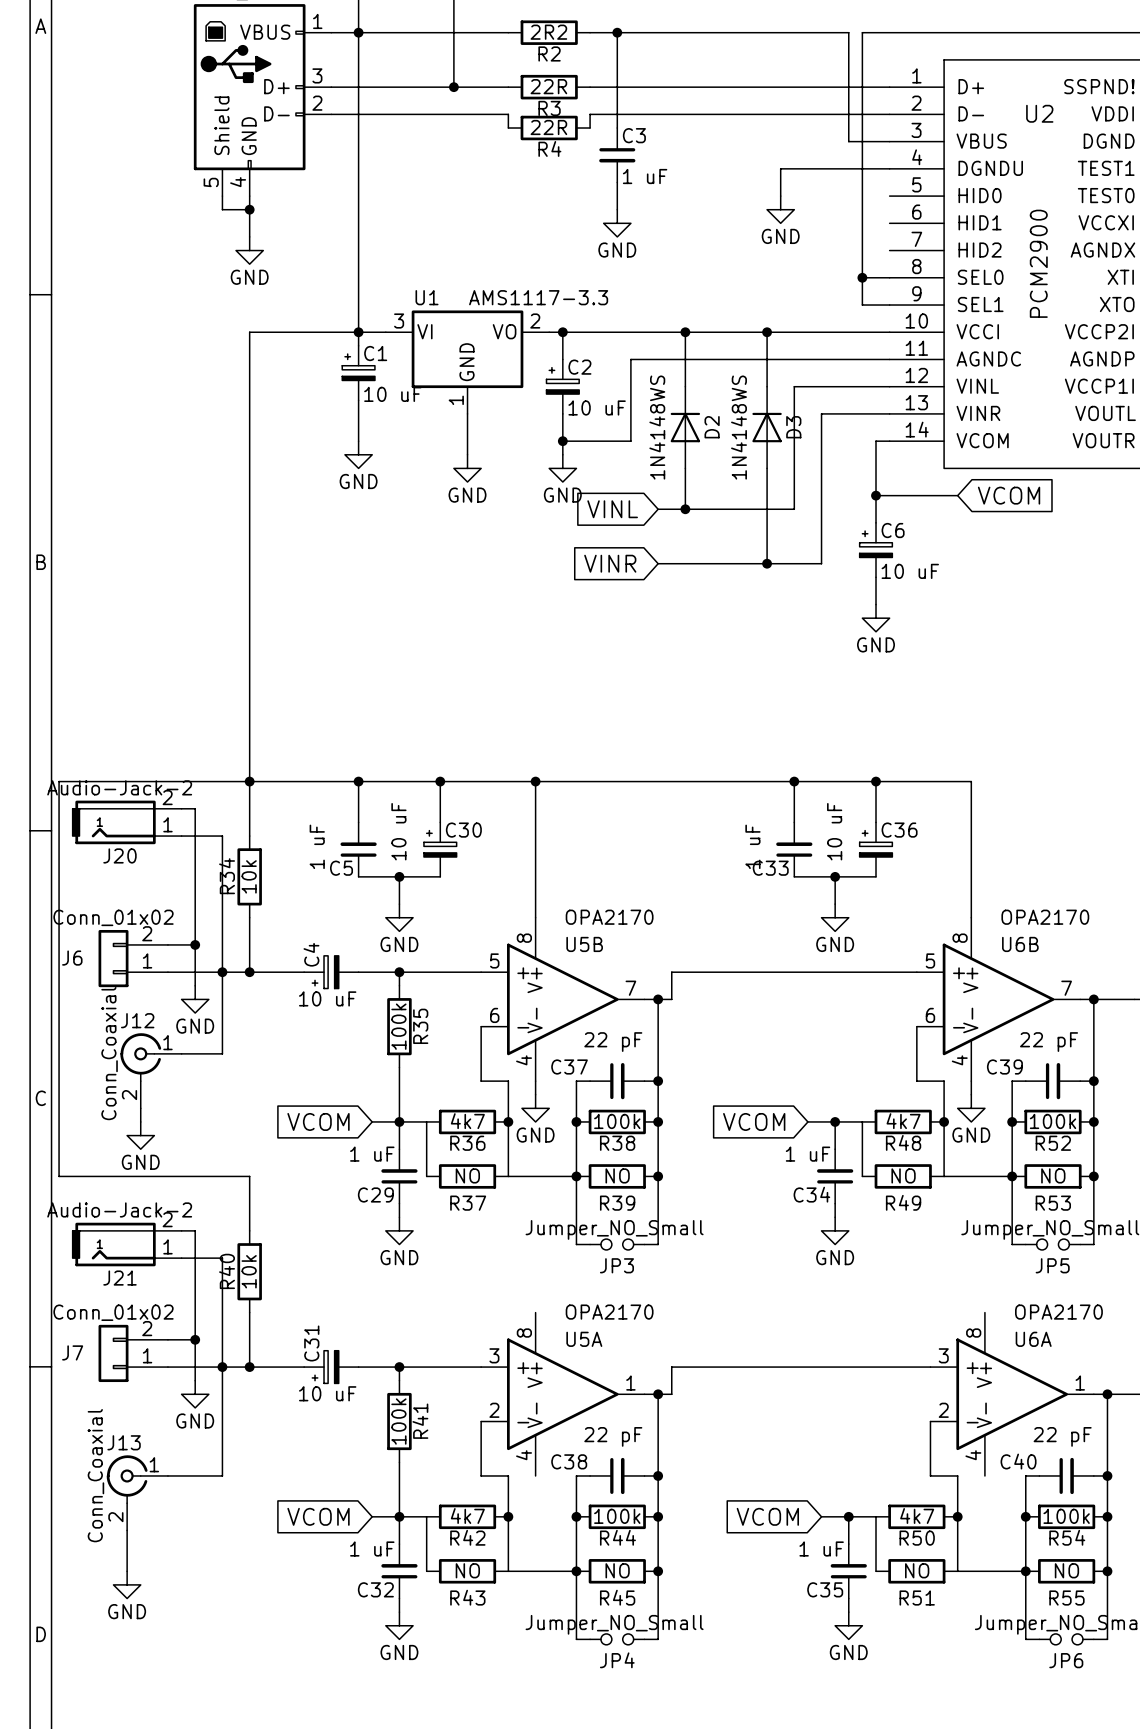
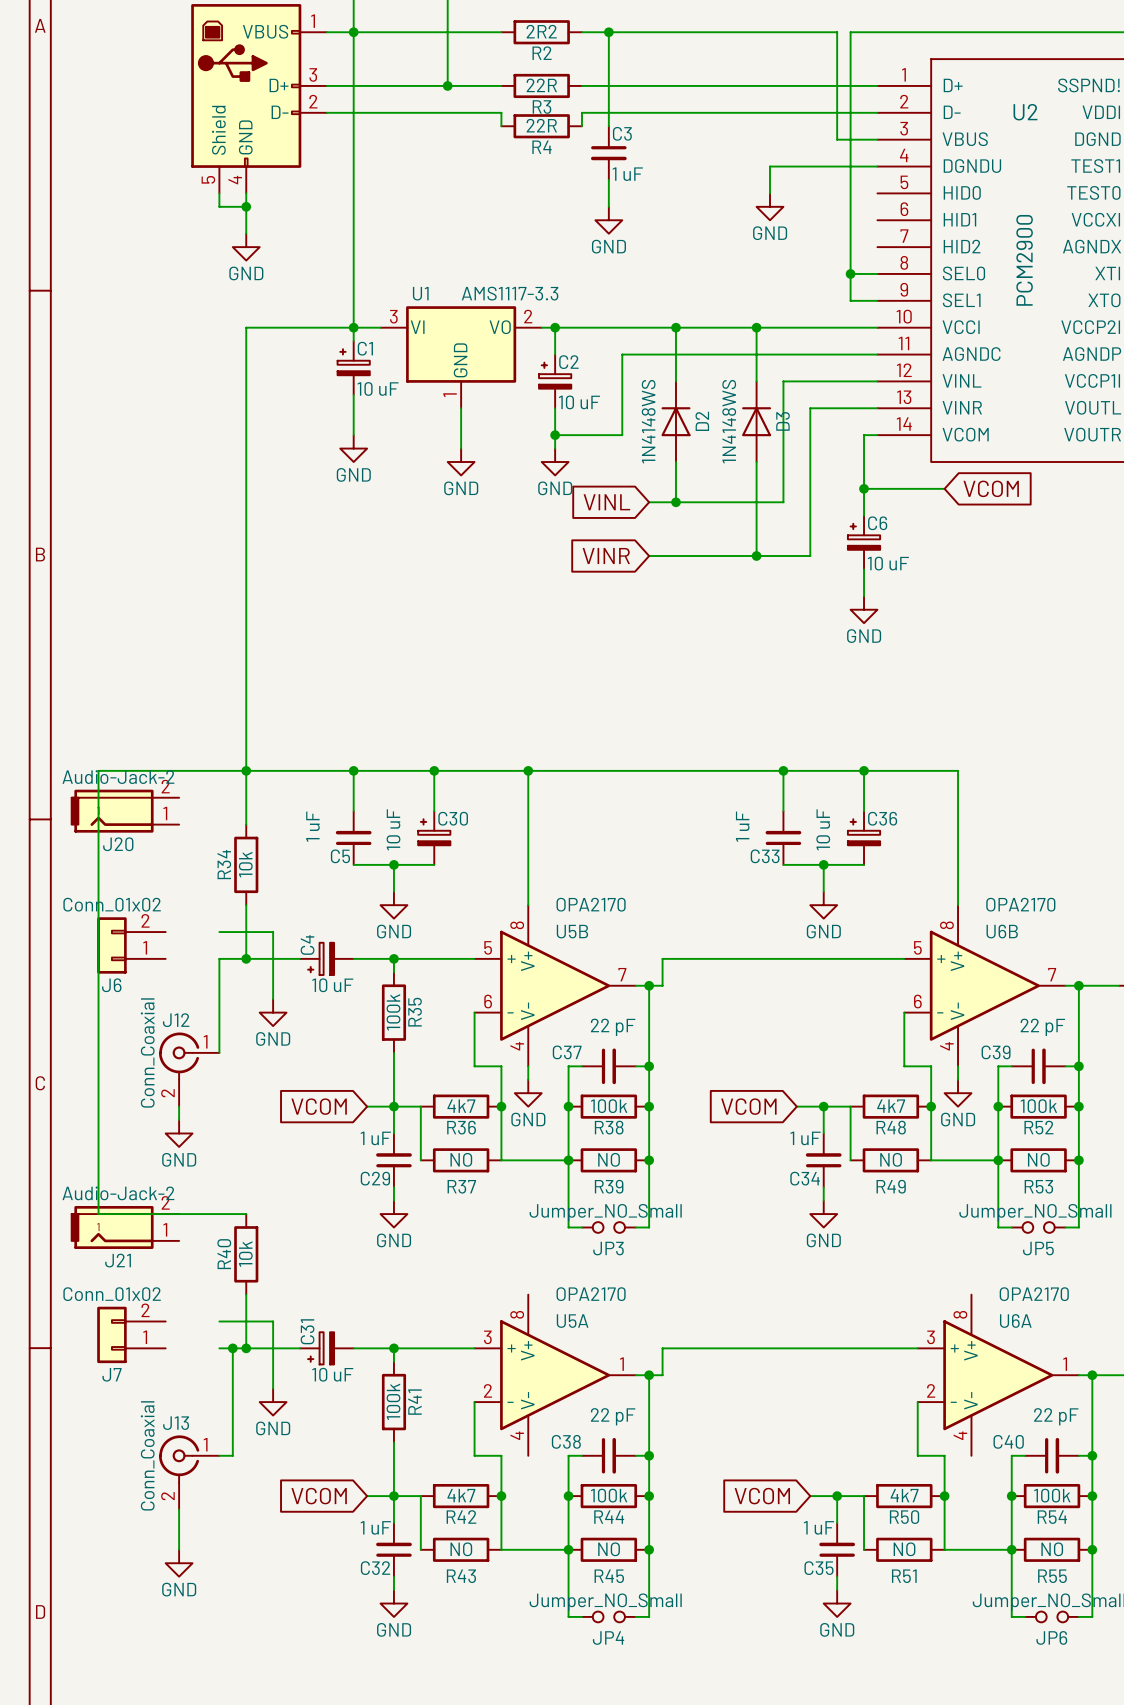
wire: (99, 781) (59, 781) (59, 1176) (249, 1176) (249, 1230) -> (98, 770) (98, 1214) (179, 1214)
wire: (181, 808) (195, 808) (195, 985) -> none
wire: (181, 836) (222, 836) (222, 972) (167, 972) -> none
wire: (167, 944) (195, 944) -> none
junction: (195, 944) -> none
wire: none -> (219, 932) (273, 932) (273, 999)
J6 name position: J6 (72, 958) -> J6 (111, 985)
junction: (222, 972) -> none
power symbol: GND (195, 999) -> none
power symbol: none -> GND (273, 1012)
wire: (181, 1053) (222, 1053) -> (219, 1052) (219, 1039)
J12 position: (150, 1070) -> (189, 1069)
wire: (140, 1108) (140, 1121) -> (179, 1106) (179, 1120)
power symbol position: GND (140, 1135) -> GND (179, 1133)
wire: (195, 1230) (195, 1380) -> (192, 1214) (246, 1214)
wire: (181, 1258) (222, 1258) (222, 1475) (167, 1475) -> none
wire: (167, 1339) (195, 1339) -> none
junction: (195, 1339) -> none
wire: none -> (219, 1321) (273, 1321) (273, 1388)
J7 name position: J7 (72, 1352) -> J7 (112, 1374)
wire: (167, 1367) (222, 1367) -> none
junction position: (222, 1367) -> (232, 1348)
wire: none -> (232, 1348) (232, 1455) (219, 1455)
power symbol position: GND (195, 1394) -> GND (273, 1402)
J13 position: (137, 1492) -> (189, 1472)
wire: (127, 1530) (127, 1571) -> (179, 1509) (179, 1549)
power symbol position: GND (127, 1584) -> GND (179, 1563)

